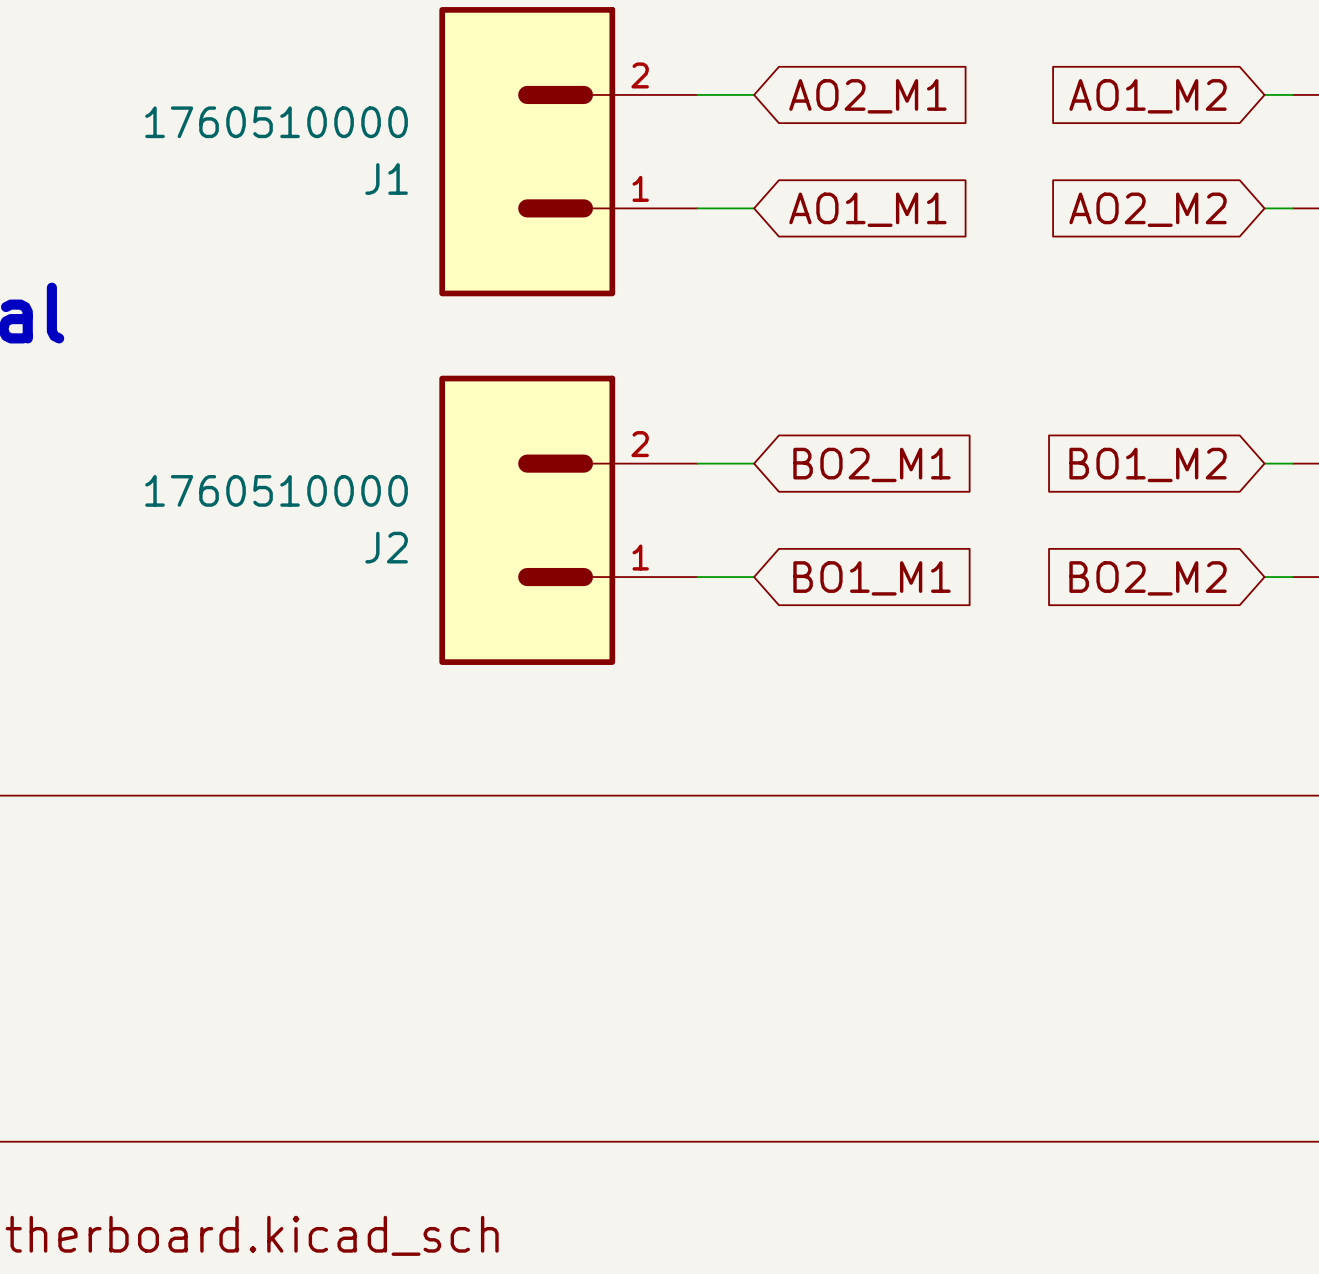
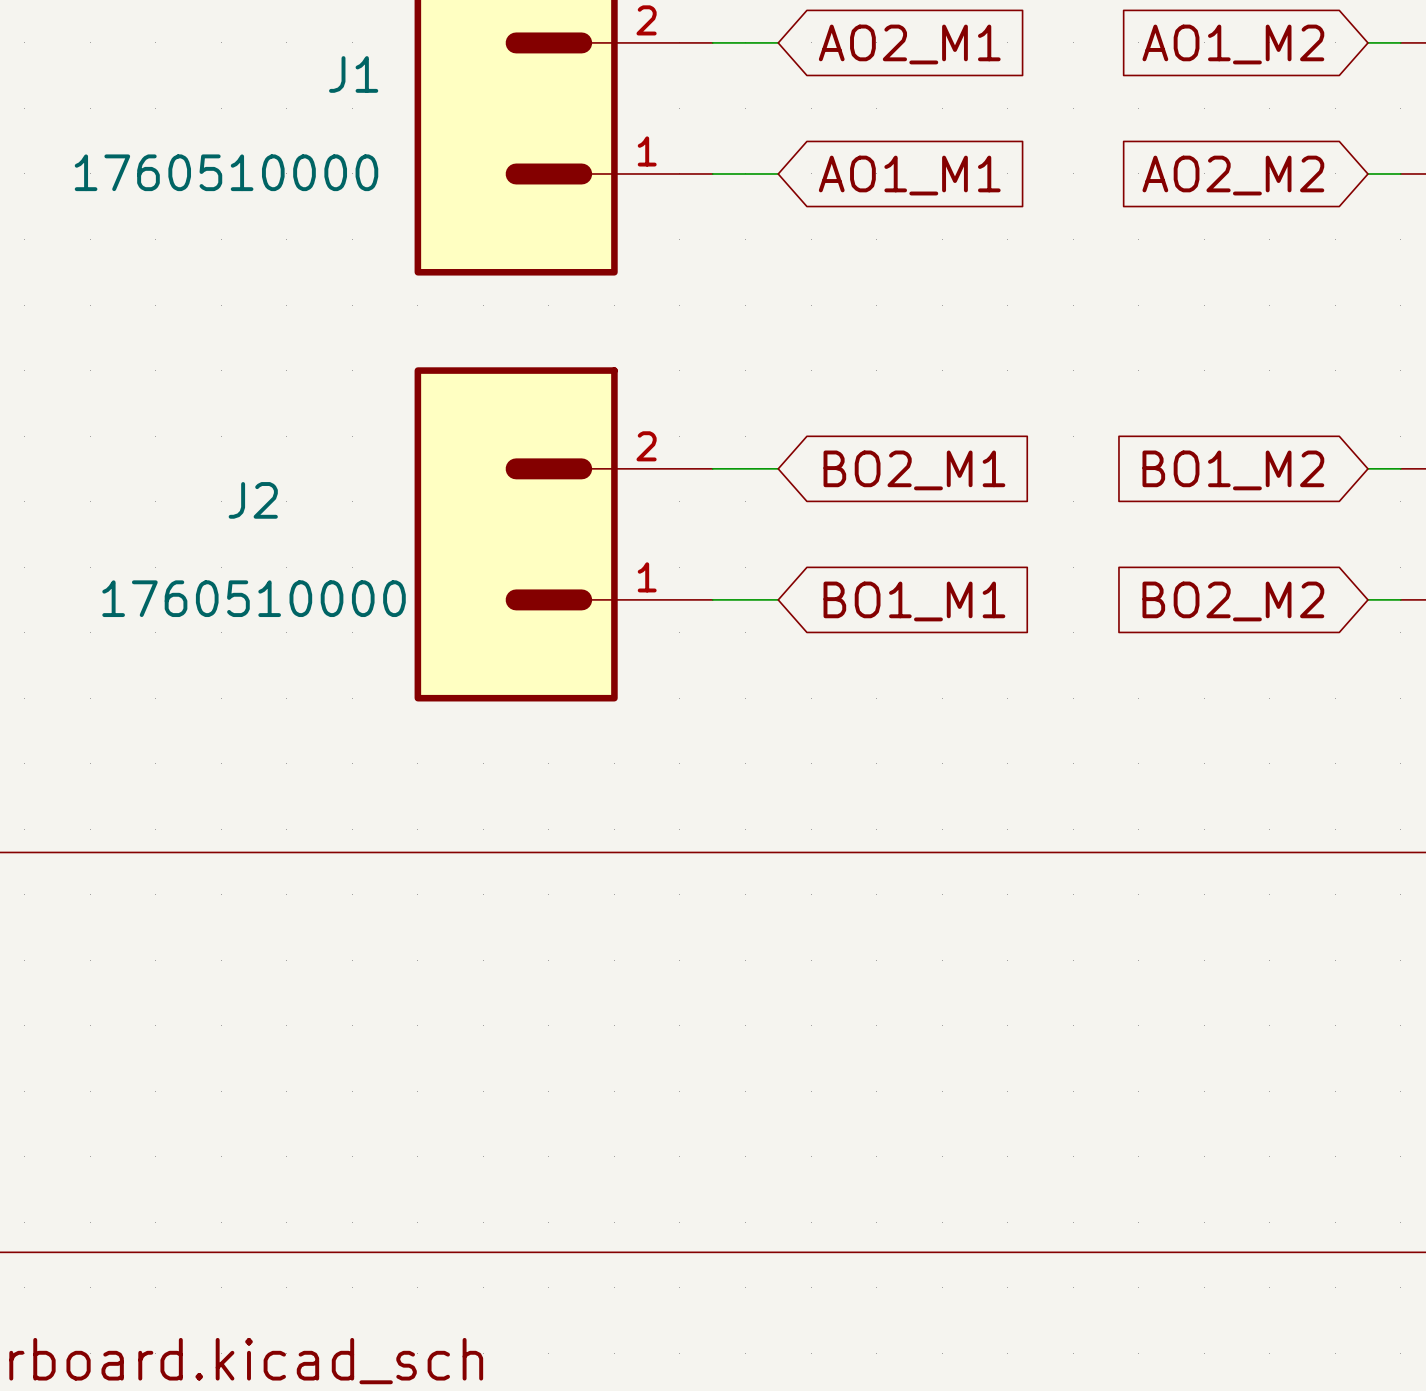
J1 value position: 1760510000 (276, 122) -> 1760510000 (226, 172)
J1 name position: J1 (386, 178) -> J1 (353, 74)
J2 value position: 1760510000 (276, 490) -> 1760510000 (254, 598)
J2 name position: J2 (386, 547) -> J2 (253, 500)

